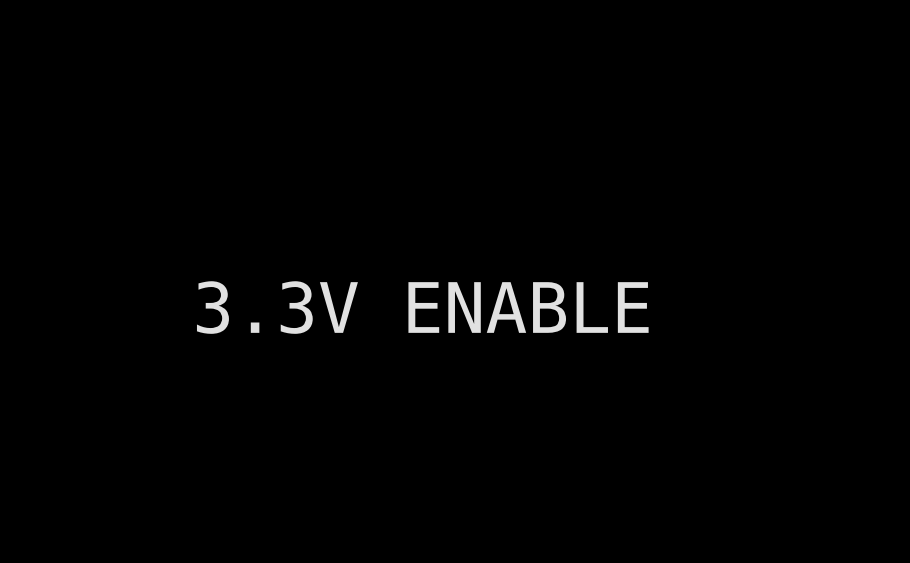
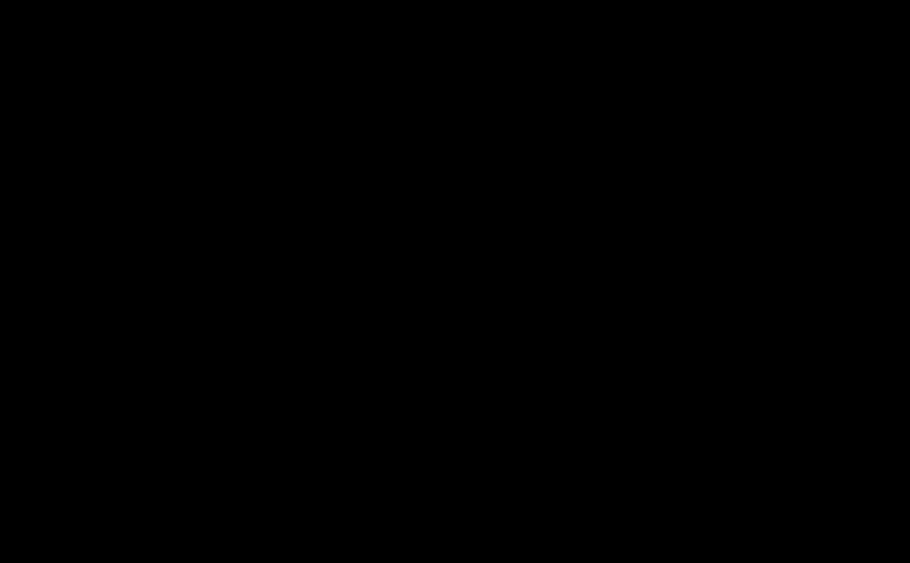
text: 3.3V ENABLE (422, 307) -> none

